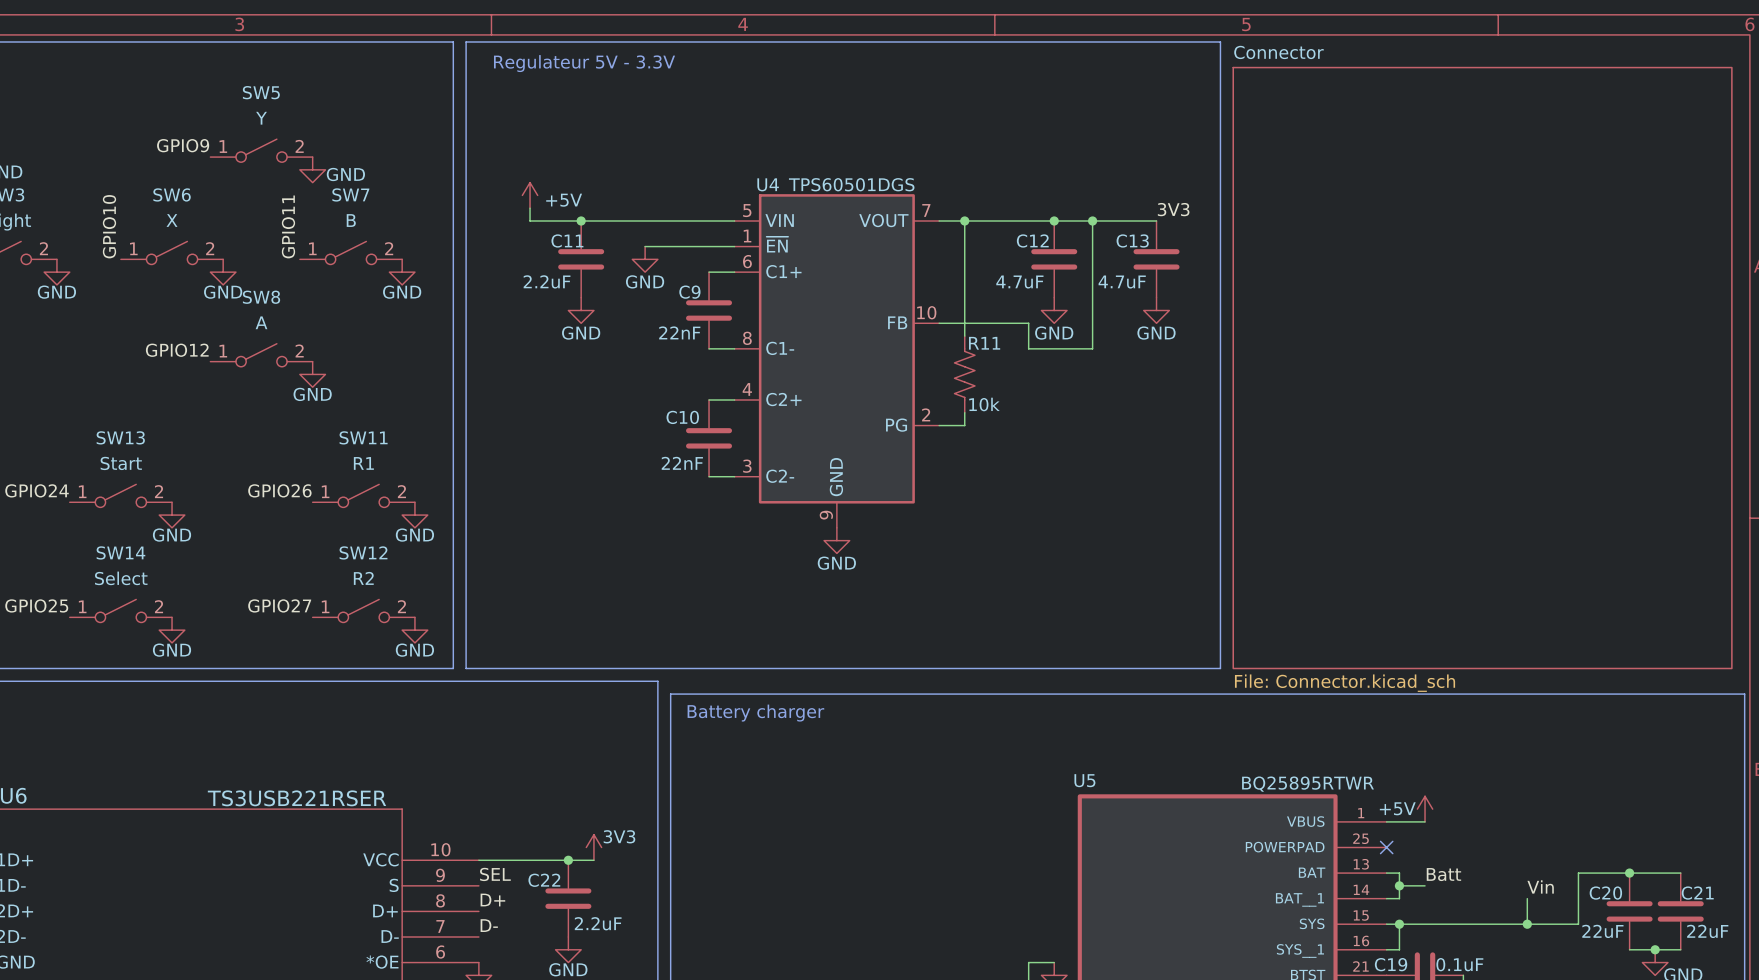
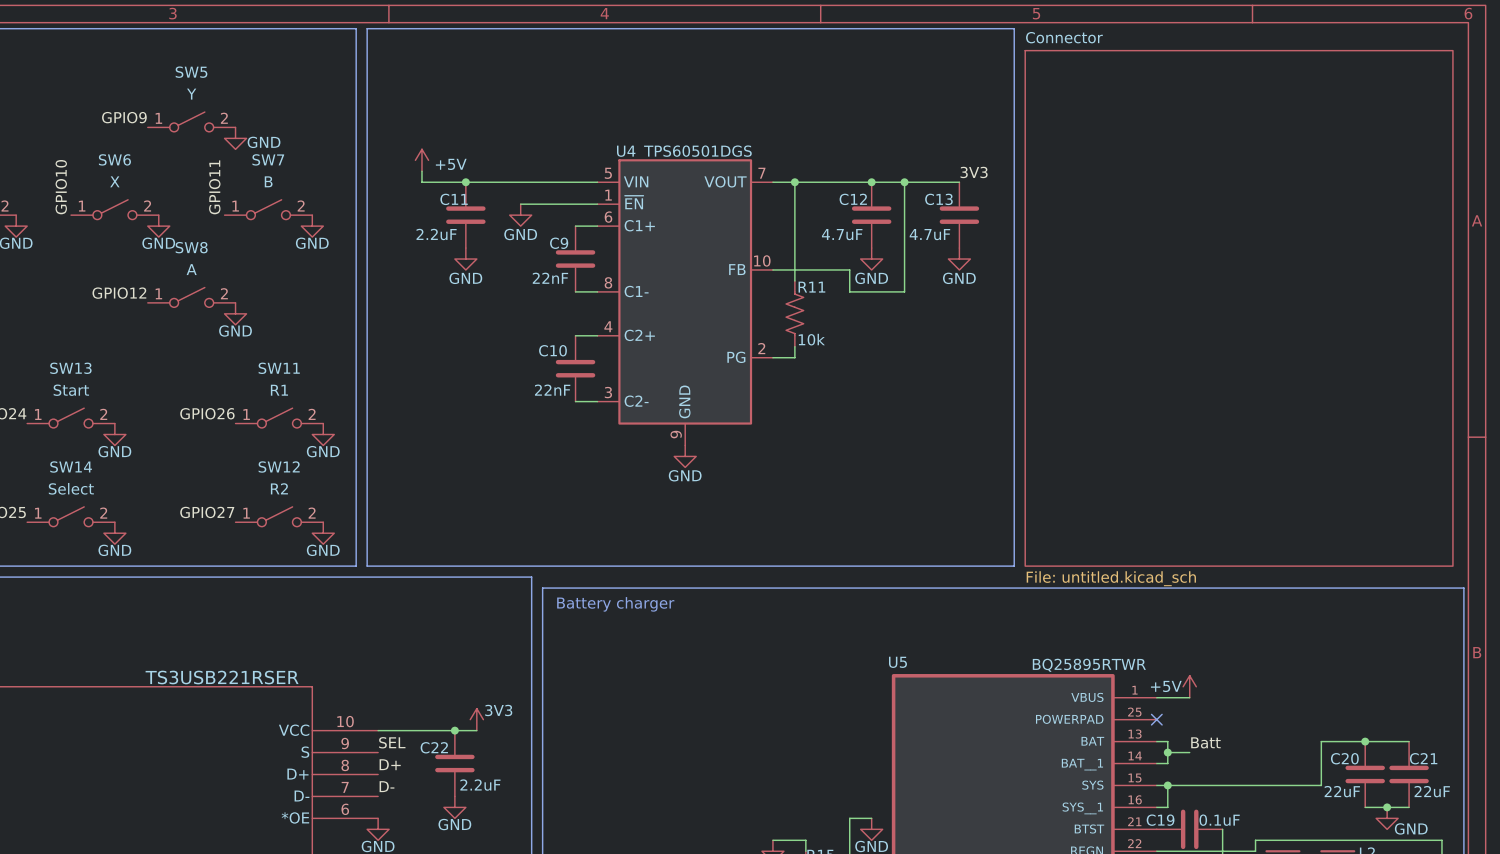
text: Regulateur 5V - 3.3V (584, 63) -> none
sheet Connector value: File: Connector.kicad_sch (1345, 683) -> File: untitled.kicad_sch (1111, 578)
label: Vin (1540, 886) -> none
wire: (1527, 898) (1527, 924) -> none
junction: (1527, 924) -> none

